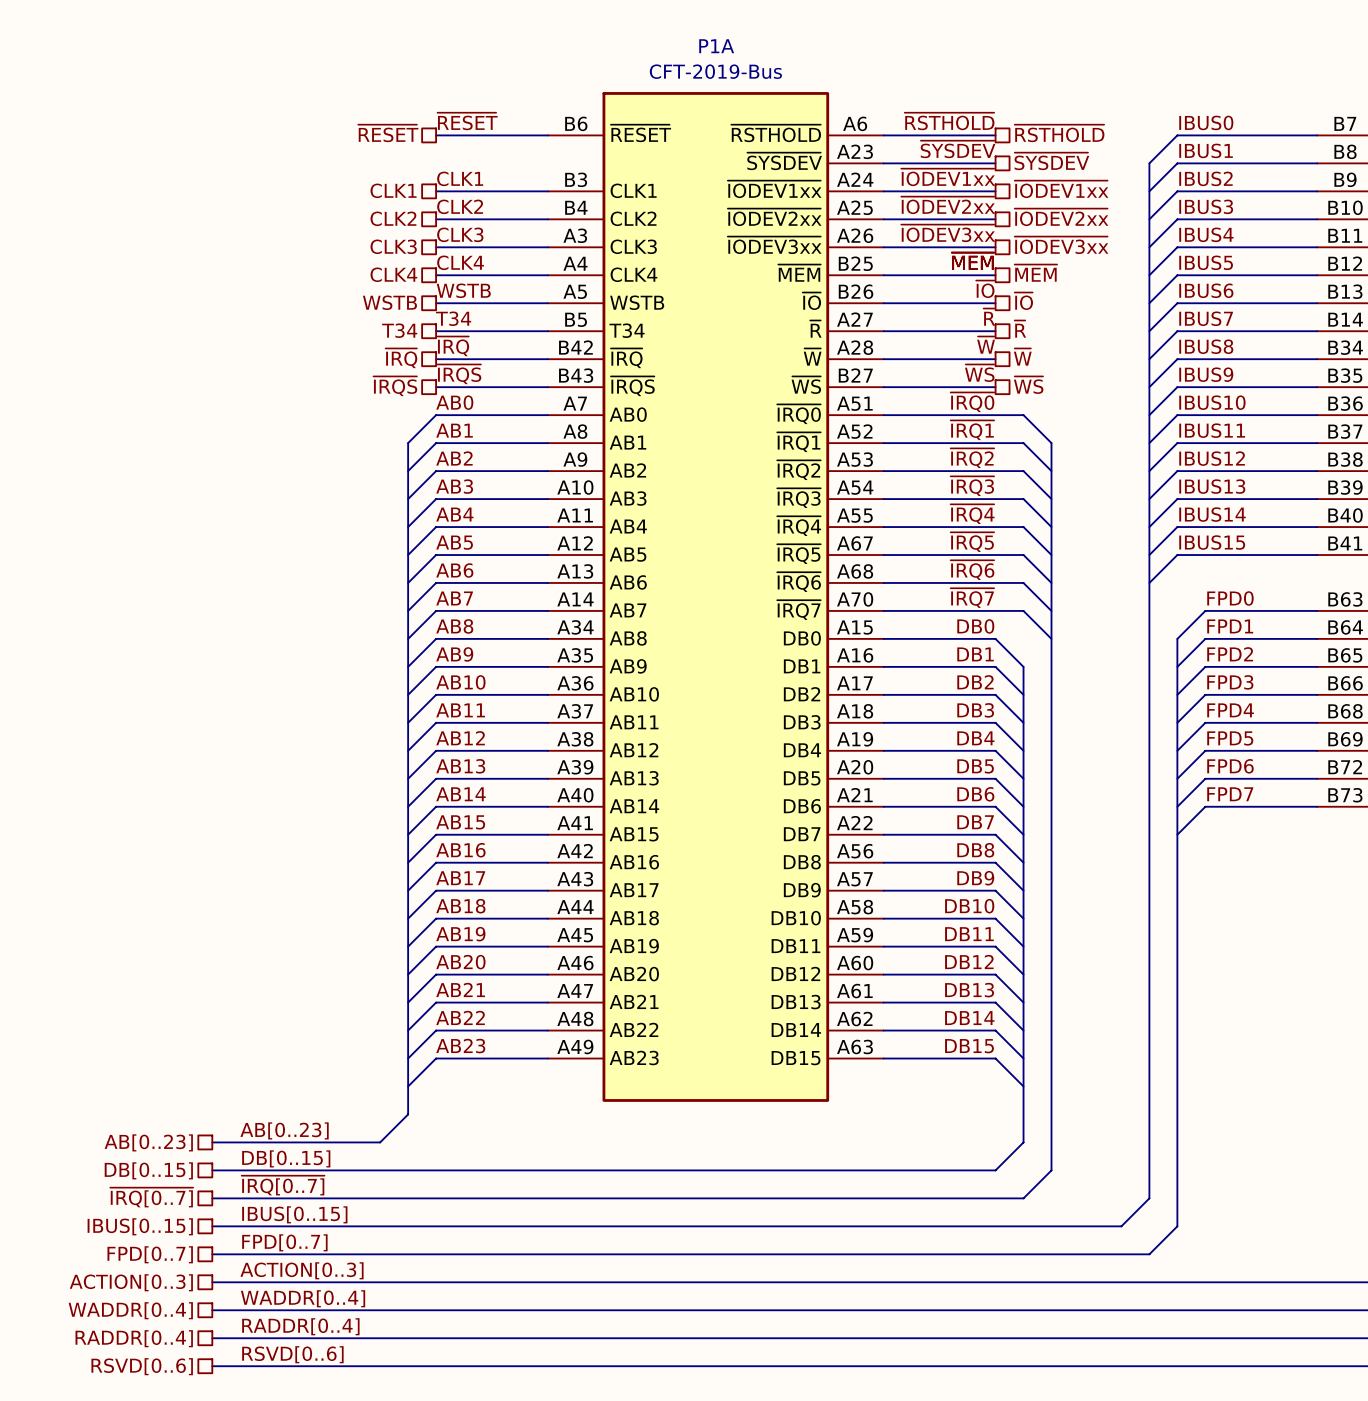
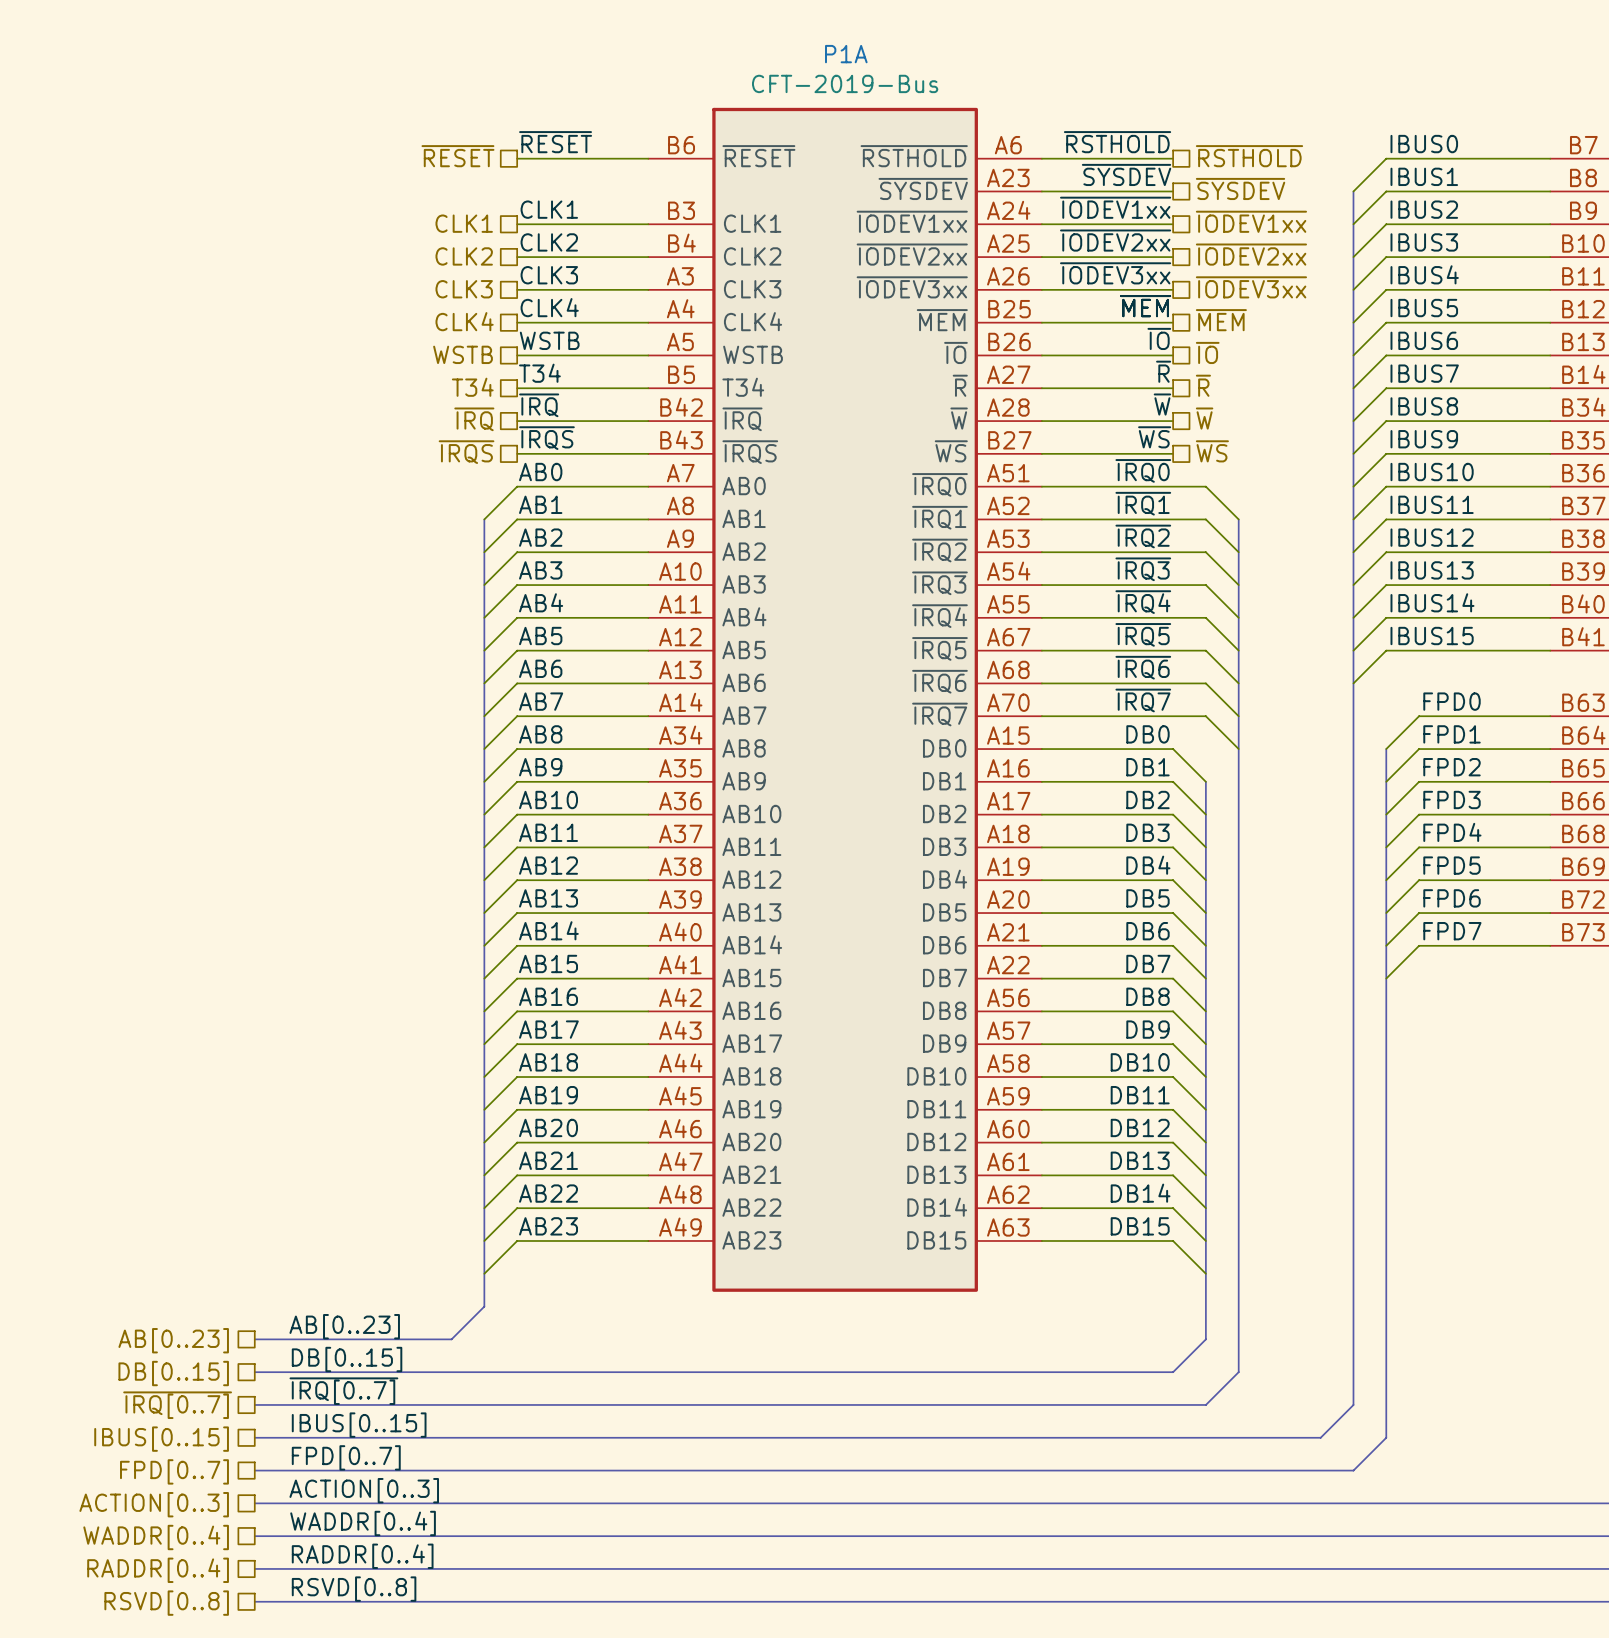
label: RSVD[0..6] (292, 1354) -> RSVD[0..8] (354, 1589)
hierarchical label: RSVD[0..6] (142, 1366) -> RSVD[0..8] (166, 1603)

